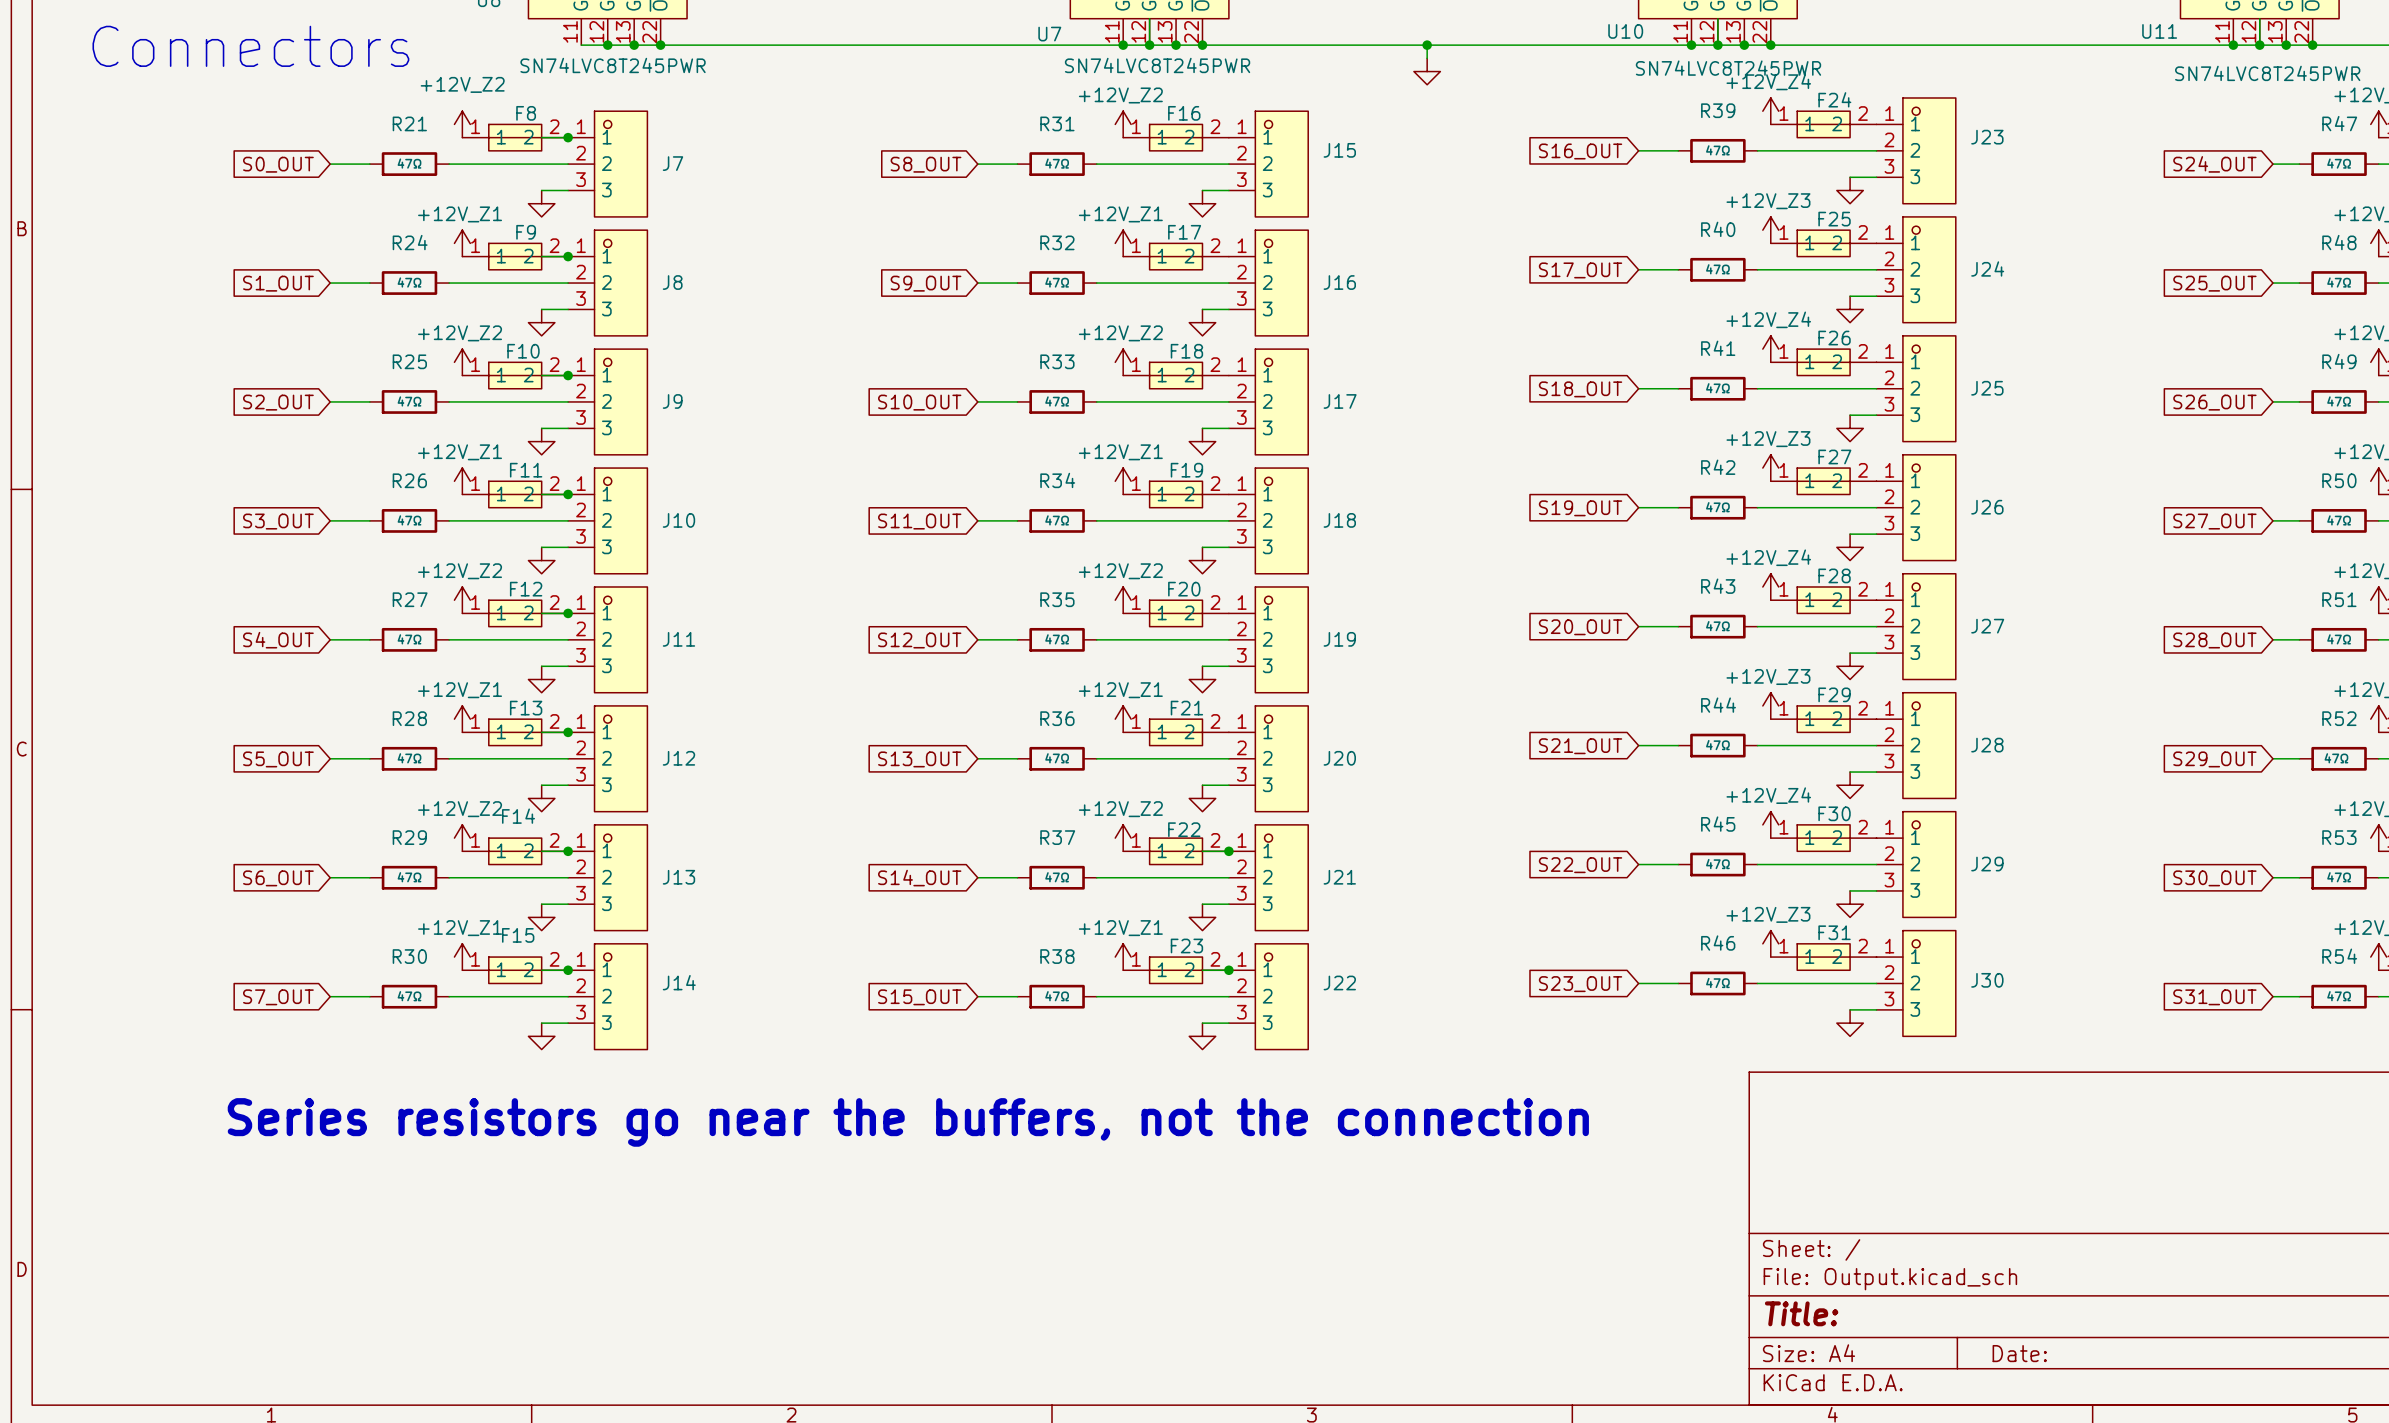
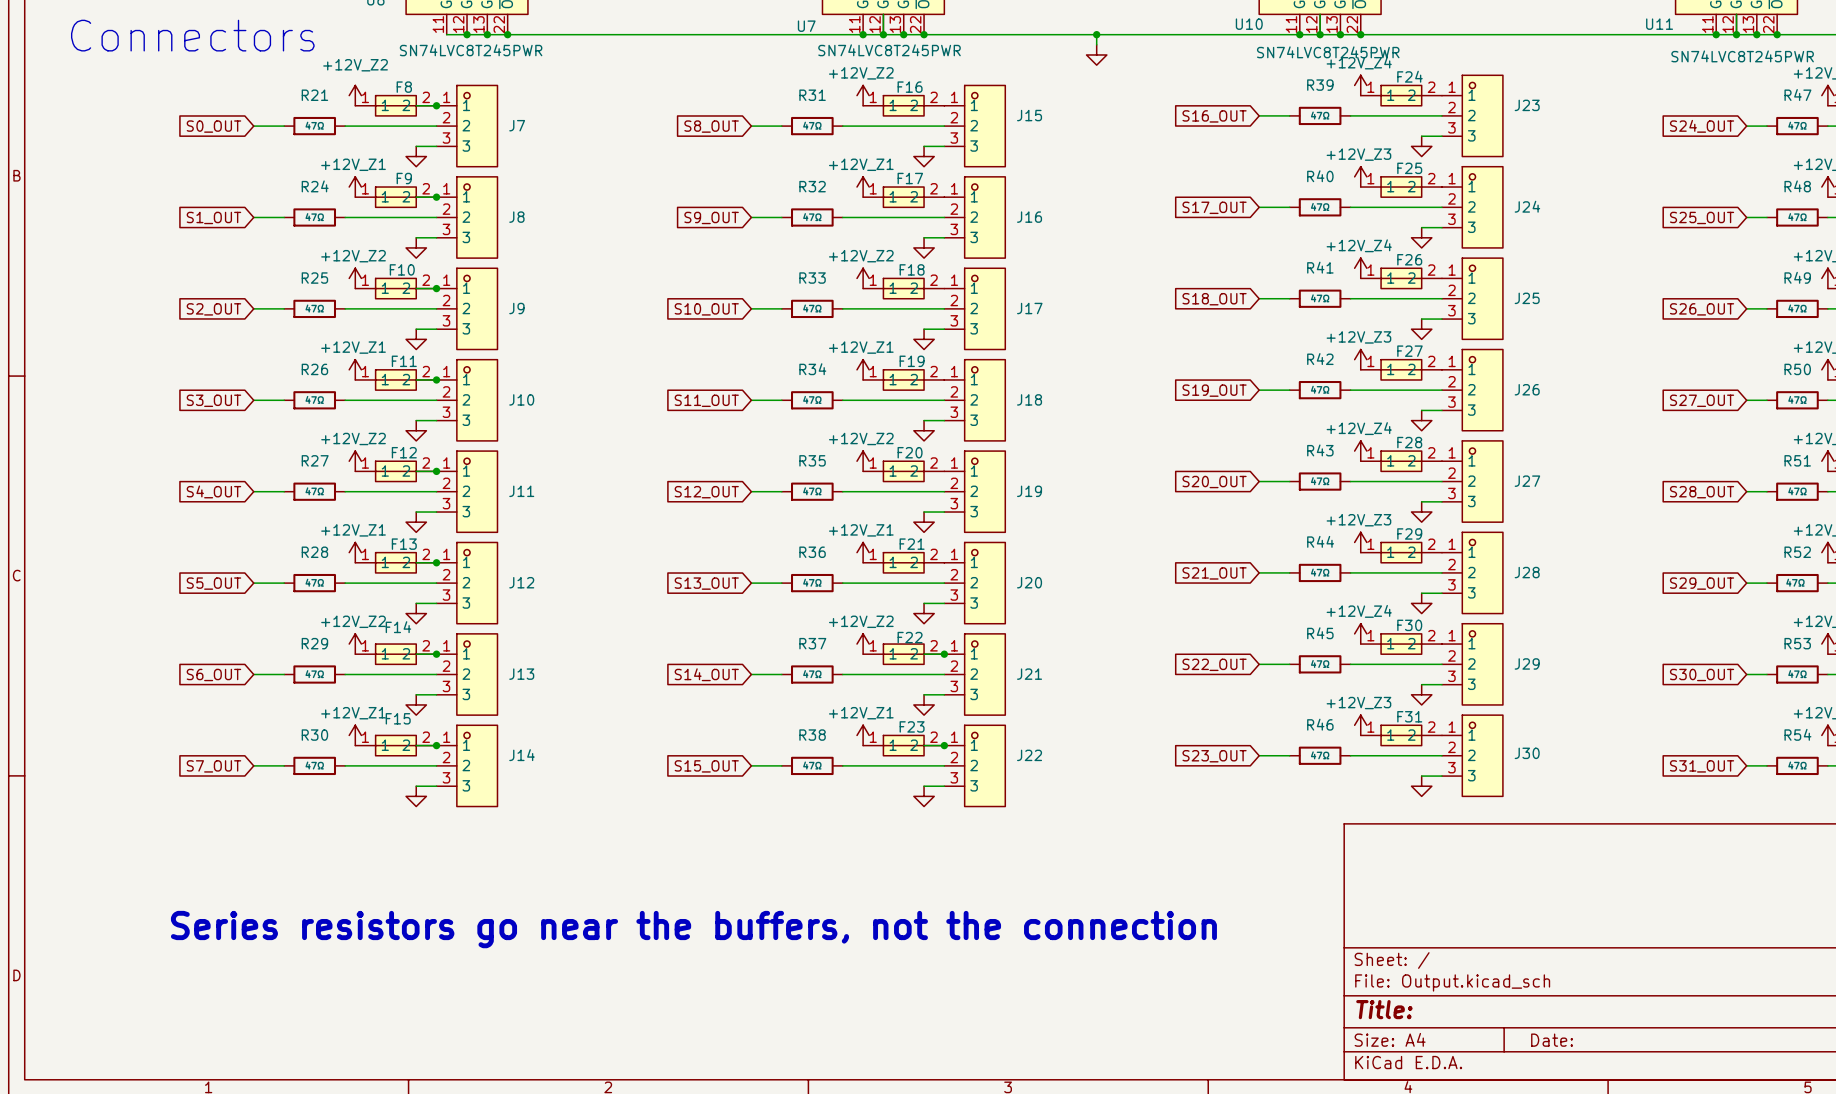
text position: Series resistors go near the buffers, not the connection (908, 1122) -> Series resistors go near the buffers, not the connection (693, 929)

